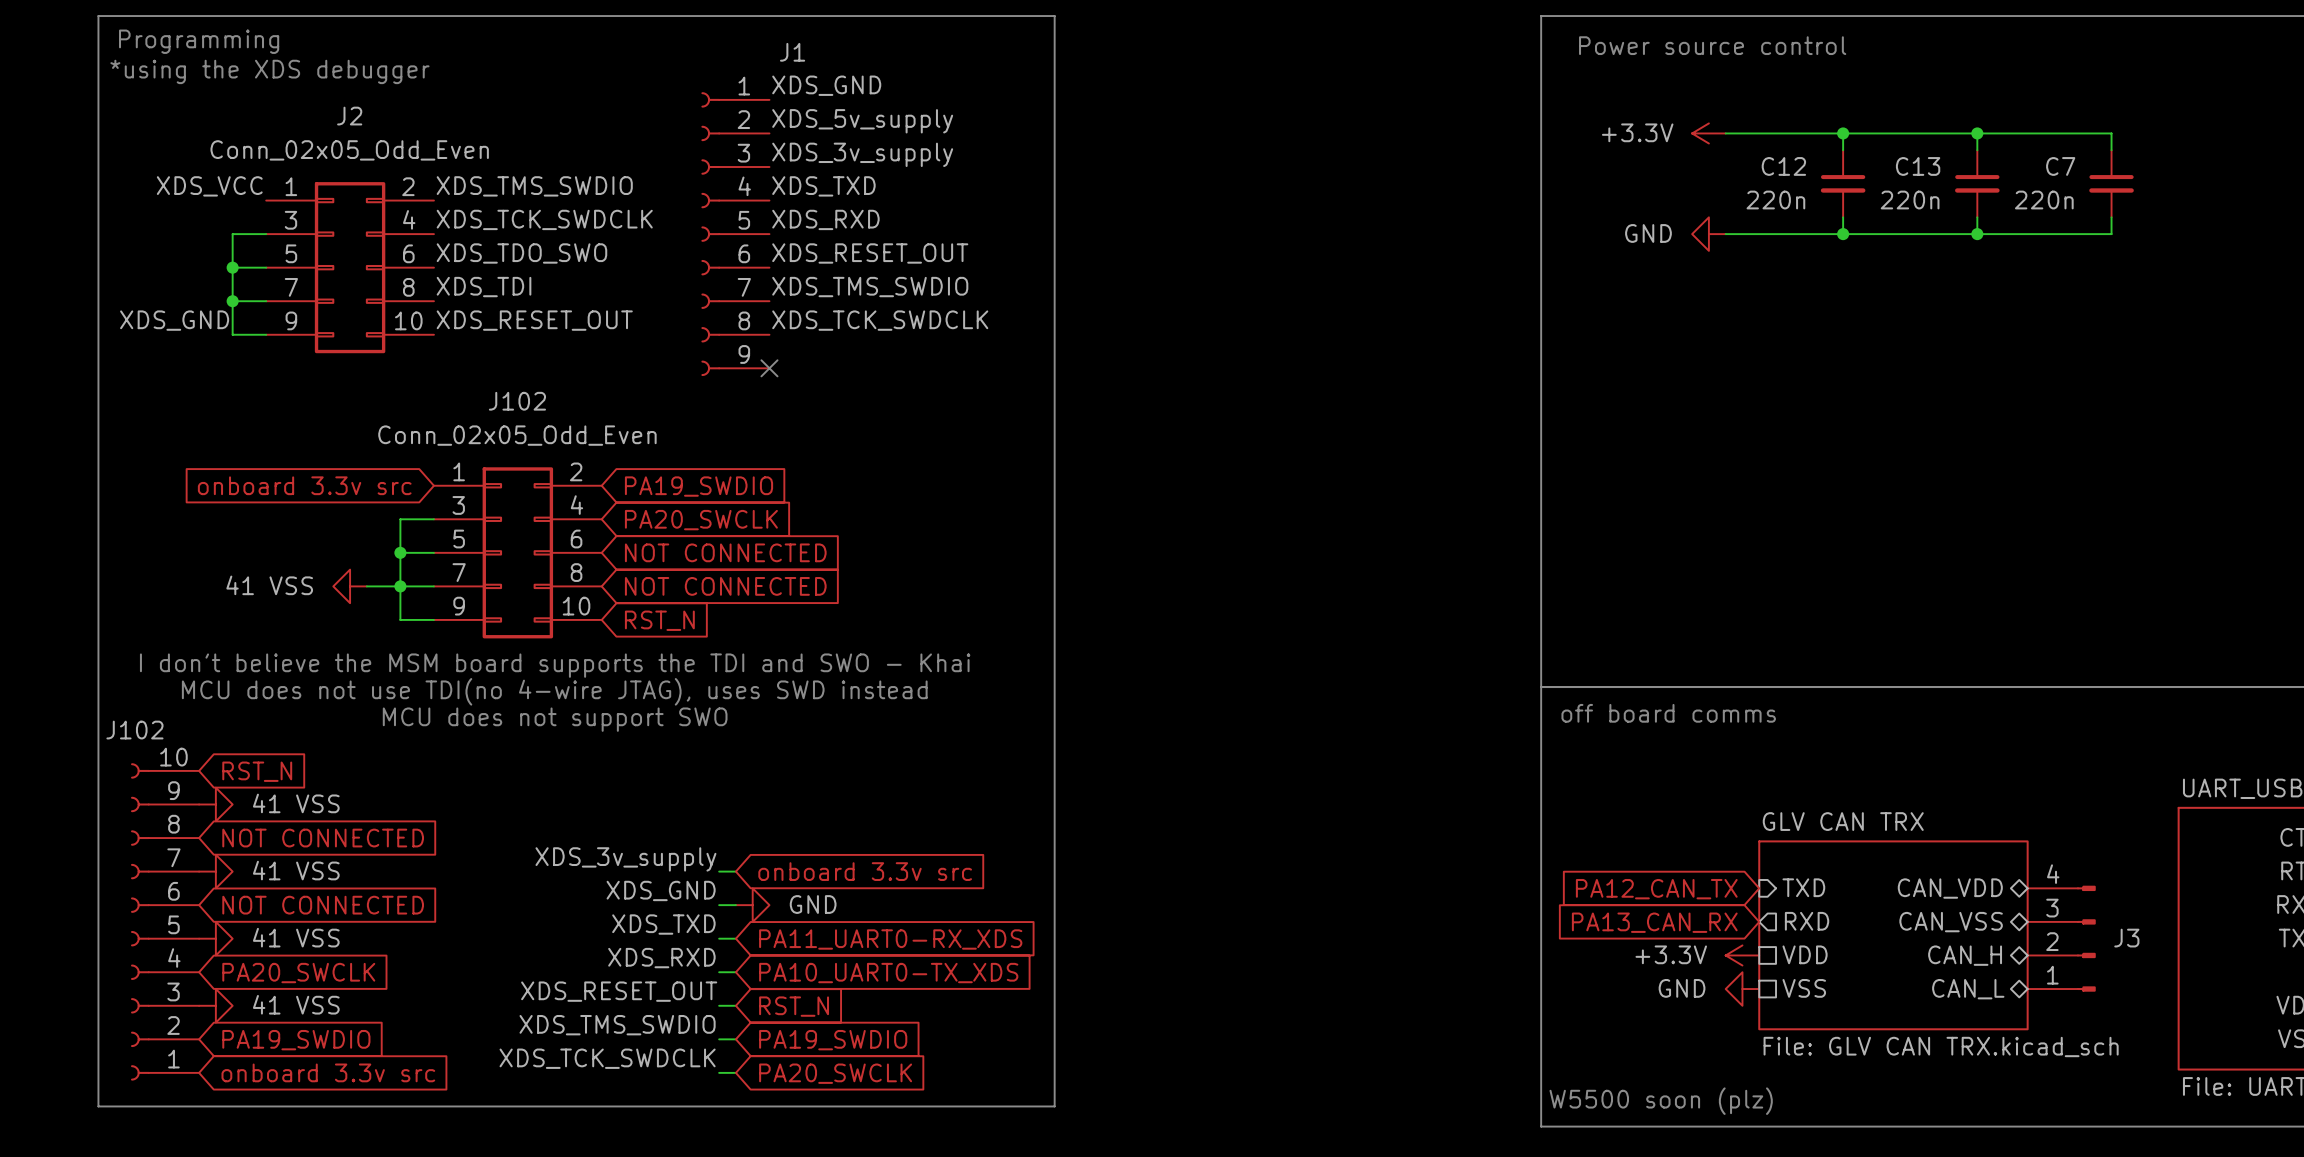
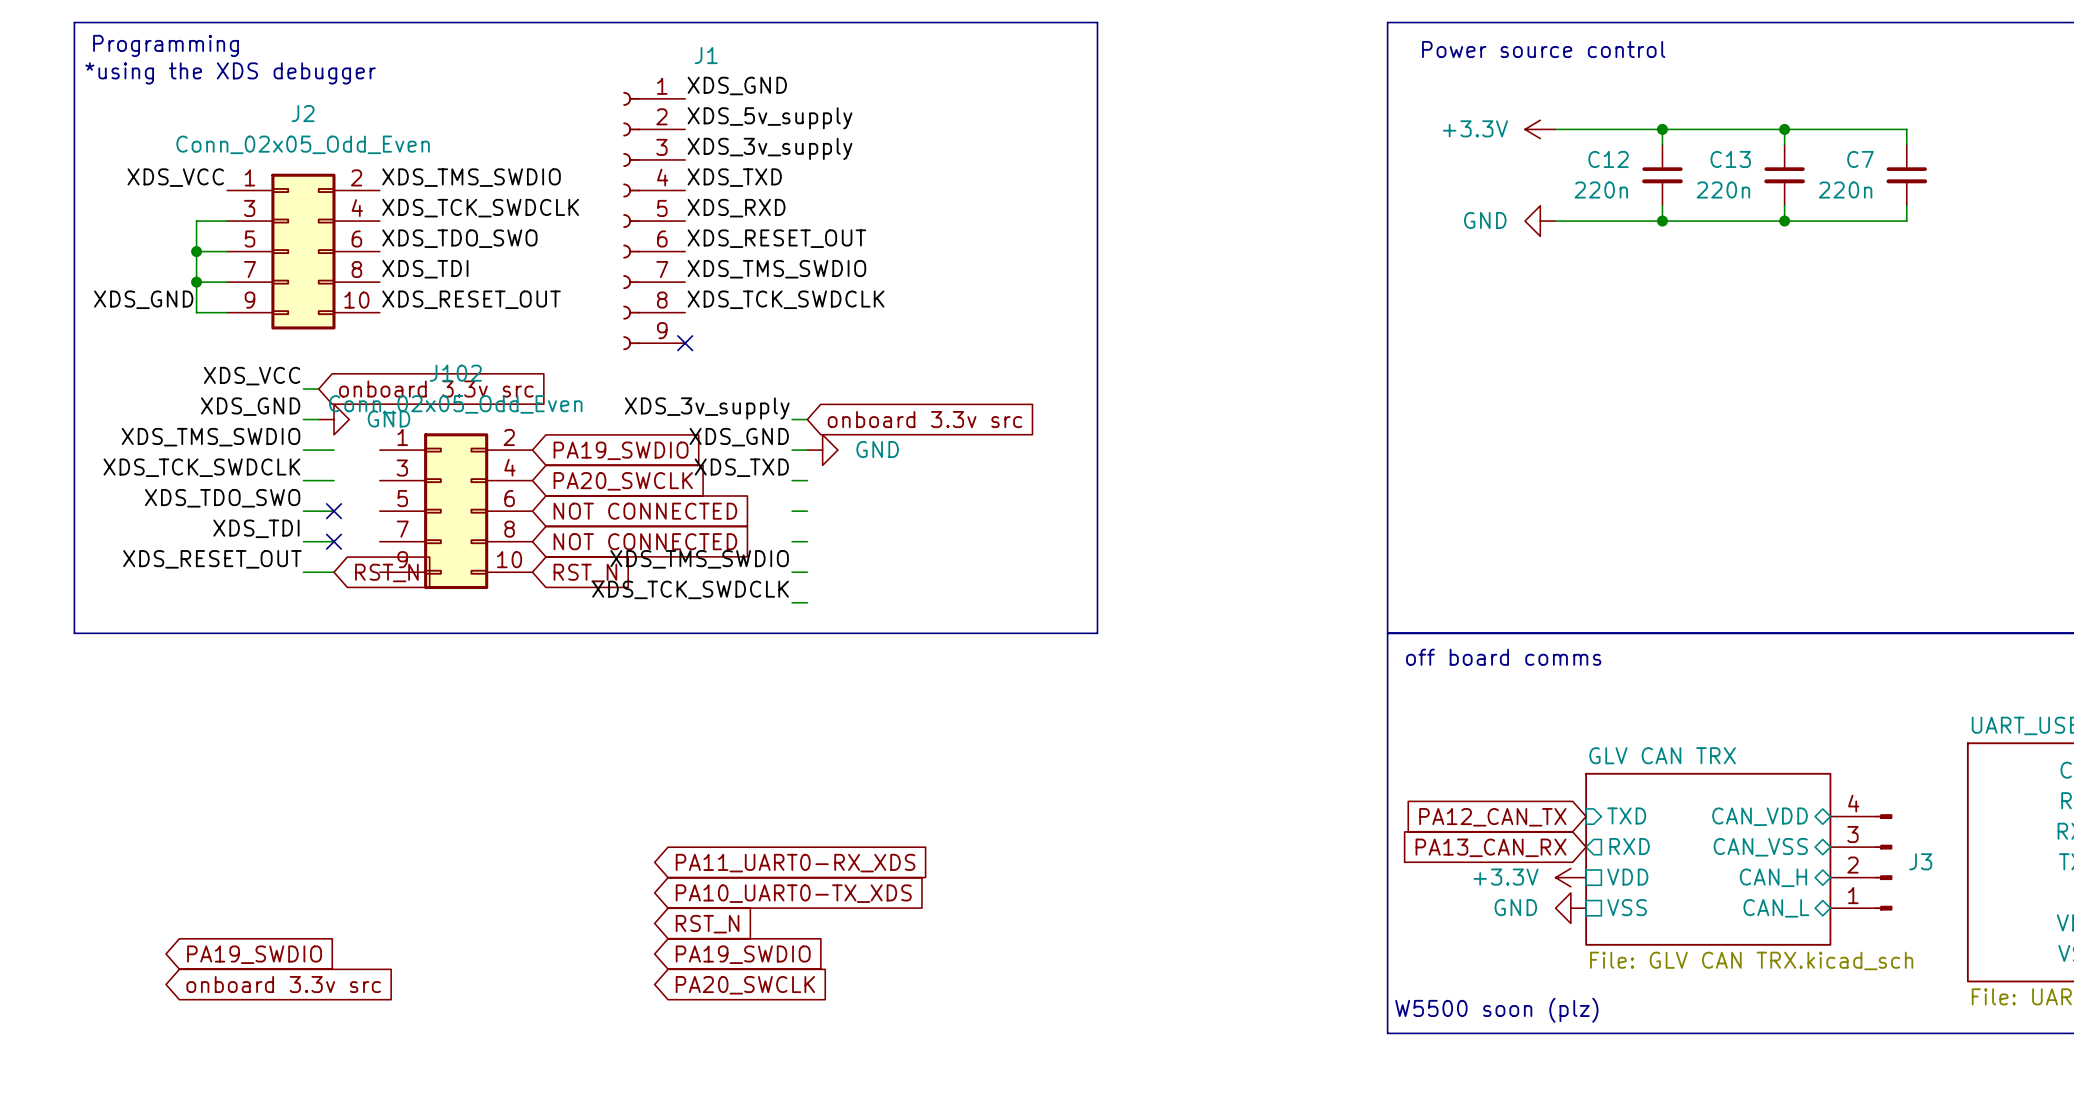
line: (1054, 16) (1054, 1106) (98, 1106) (98, 687) -> (944, 22) (1097, 22) (1097, 633) (74, 633)
label: none -> XDS_VCC (252, 376)
wire: none -> (303, 389) (318, 389)
label: none -> XDS_GND (250, 406)
label: none -> XDS_3v_supply (707, 408)
wire: none -> (303, 419) (318, 419)
power symbol: none -> GND (333, 419)
wire: none -> (792, 419) (807, 419)
global label: none -> onboard 3.3v src (924, 419)
label: none -> XDS_TMS_SWDIO (210, 437)
label: none -> XDS_GND (739, 437)
global label rotation: 0° (304, 485) -> 180° (436, 389)
wire: none -> (303, 450) (333, 450)
wire: none -> (792, 450) (807, 450)
power symbol: none -> GND (822, 450)
label: none -> XDS_TCK_SWDCLK (201, 467)
label: none -> XDS_TXD (741, 467)
wire: none -> (303, 480) (333, 480)
wire: (433, 519) (400, 519) (400, 619) (433, 619) -> none
wire: none -> (792, 480) (807, 480)
label: none -> XDS_TDO_SWO (222, 498)
no-connect mark: none -> (333, 511)
wire: (400, 552) (433, 552) -> (303, 511) (333, 511)
junction: (400, 552) -> none
wire: none -> (792, 511) (807, 511)
label: none -> XDS_TDI (256, 528)
power symbol: 41 VSS (350, 586) -> none
wire: (383, 586) (433, 586) -> none
no-connect mark: none -> (333, 541)
junction: (400, 586) -> none
wire: none -> (792, 541) (807, 541)
label: none -> XDS_RESET_OUT (212, 559)
label: none -> XDS_TMS_SWDIO (699, 559)
wire: none -> (303, 572) (333, 572)
label: none -> XDS_TCK_SWDCLK (690, 589)
text: I don't believe the MSM board supports the TDI and SWO - Khai (555, 665) -> none
text: MCU does not use TDI(no 4-wire JTAG), uses SWD instead (554, 691) -> none
text: MCU does not support SWO (555, 719) -> none
global label position: RST_N (257, 771) -> RST_N (386, 572)
power symbol: 41 VSS (215, 804) -> none
global label: NOT CONNECTED (323, 838) -> none
label: XDS_3v_supply (625, 859) -> none
power symbol: 41 VSS (215, 871) -> none
wire: (719, 871) (735, 871) -> (792, 572) (807, 572)
global label: onboard 3.3v src (865, 871) -> none
label: XDS_GND (661, 890) -> none
global label: NOT CONNECTED (323, 905) -> none
wire: (719, 905) (735, 905) -> (792, 602) (807, 602)
power symbol: GND (752, 905) -> none
J102: (165, 921) -> none
label: XDS_TXD (663, 924) -> none
power symbol: 41 VSS (215, 938) -> none
wire: (719, 938) (735, 938) -> none
label: XDS_RXD (661, 958) -> none
wire: (719, 972) (735, 972) -> none
global label: PA20_SWCLK (298, 973) -> none
label: XDS_RESET_OUT (619, 991) -> none
power symbol: 41 VSS (215, 1005) -> none
wire: (719, 1005) (735, 1005) -> none
label: XDS_TMS_SWDIO (617, 1025) -> none
wire: (719, 1039) (735, 1039) -> none
label: XDS_TCK_SWDCLK (607, 1058) -> none
wire: (719, 1072) (735, 1072) -> none

